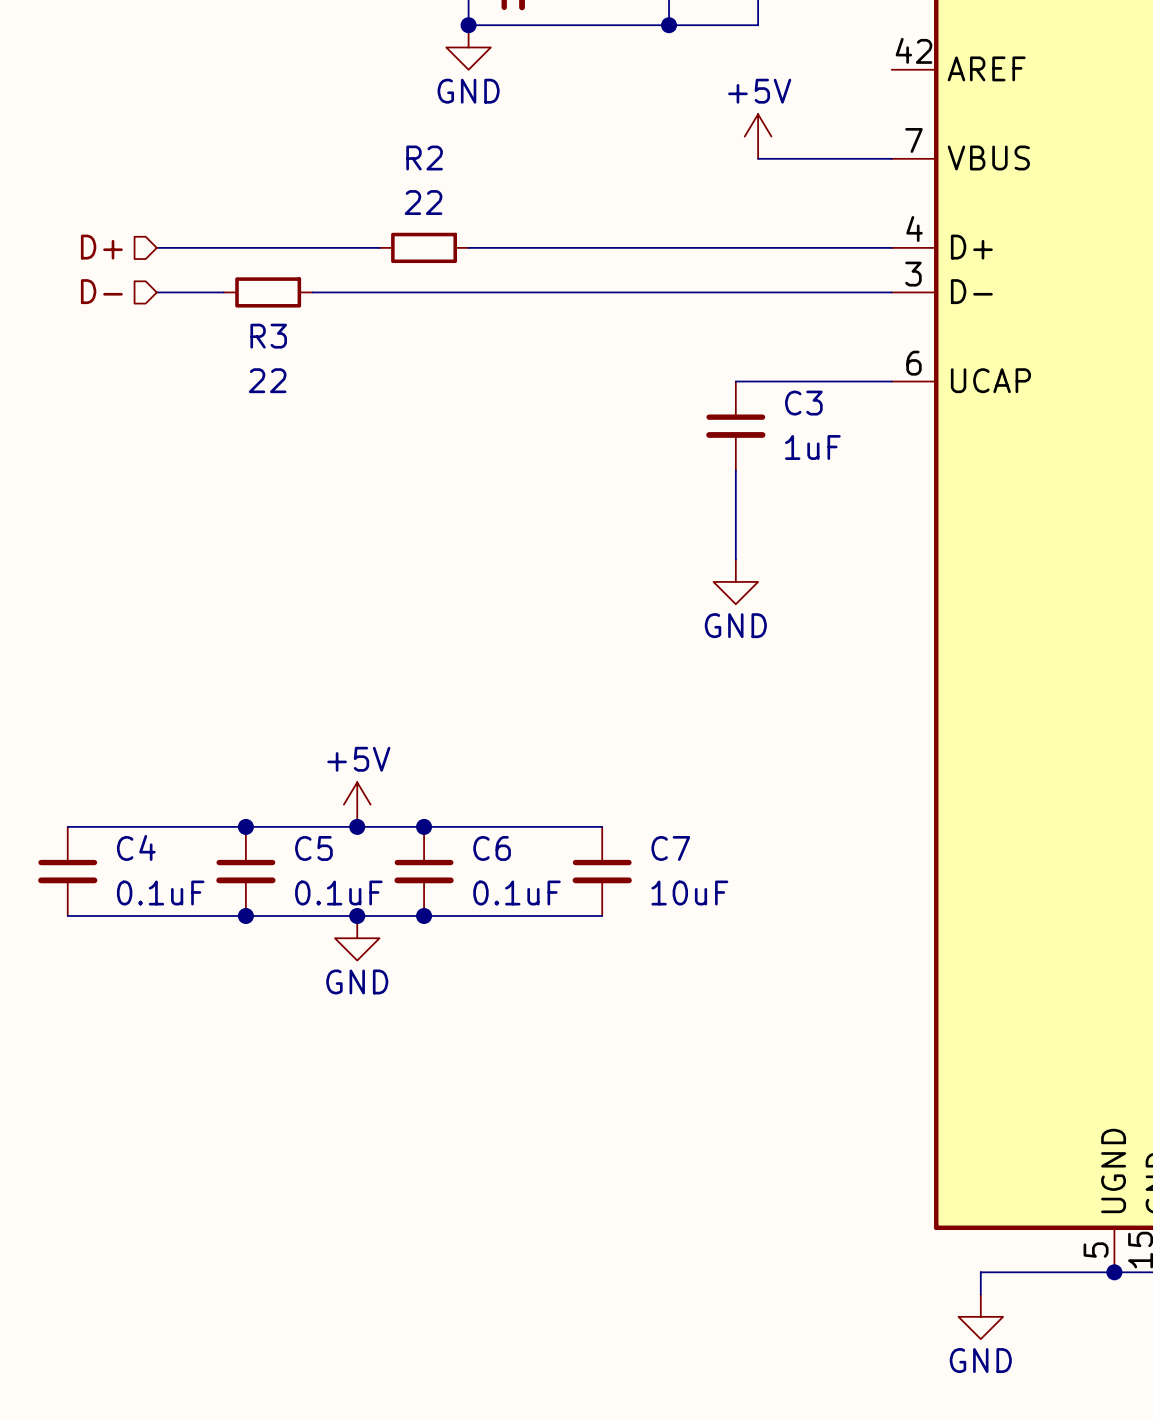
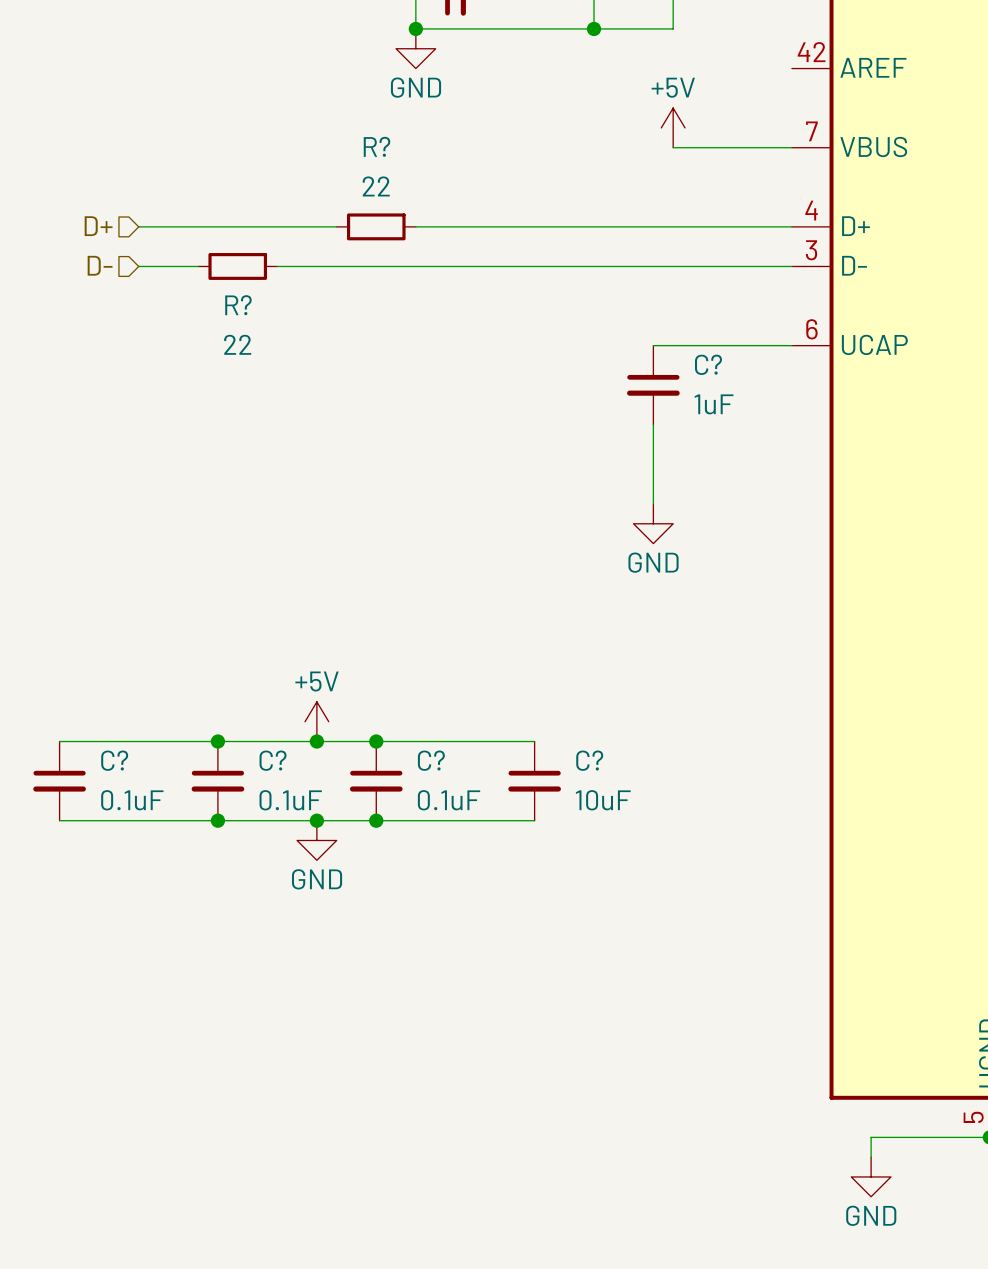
R2 name: R2 (424, 157) -> R? (376, 146)
R3 name: R3 (268, 336) -> R? (238, 305)
C3 name: C3 (803, 403) -> C? (708, 364)
C4 name: C4 (136, 847) -> C? (114, 760)
C5 name: C5 (313, 848) -> C? (273, 760)
C6 name: C6 (492, 848) -> C? (431, 760)
C7 name: C7 (670, 848) -> C? (589, 760)

